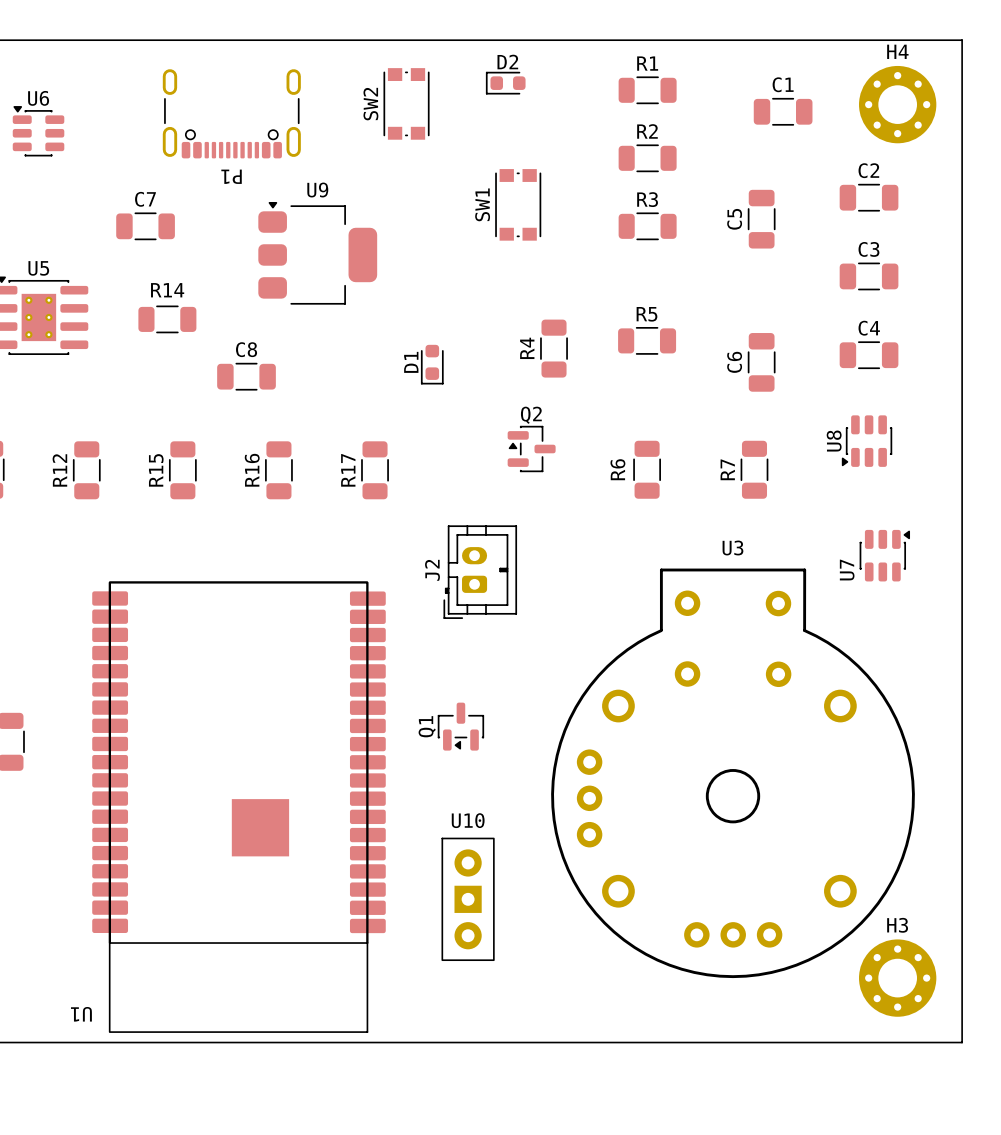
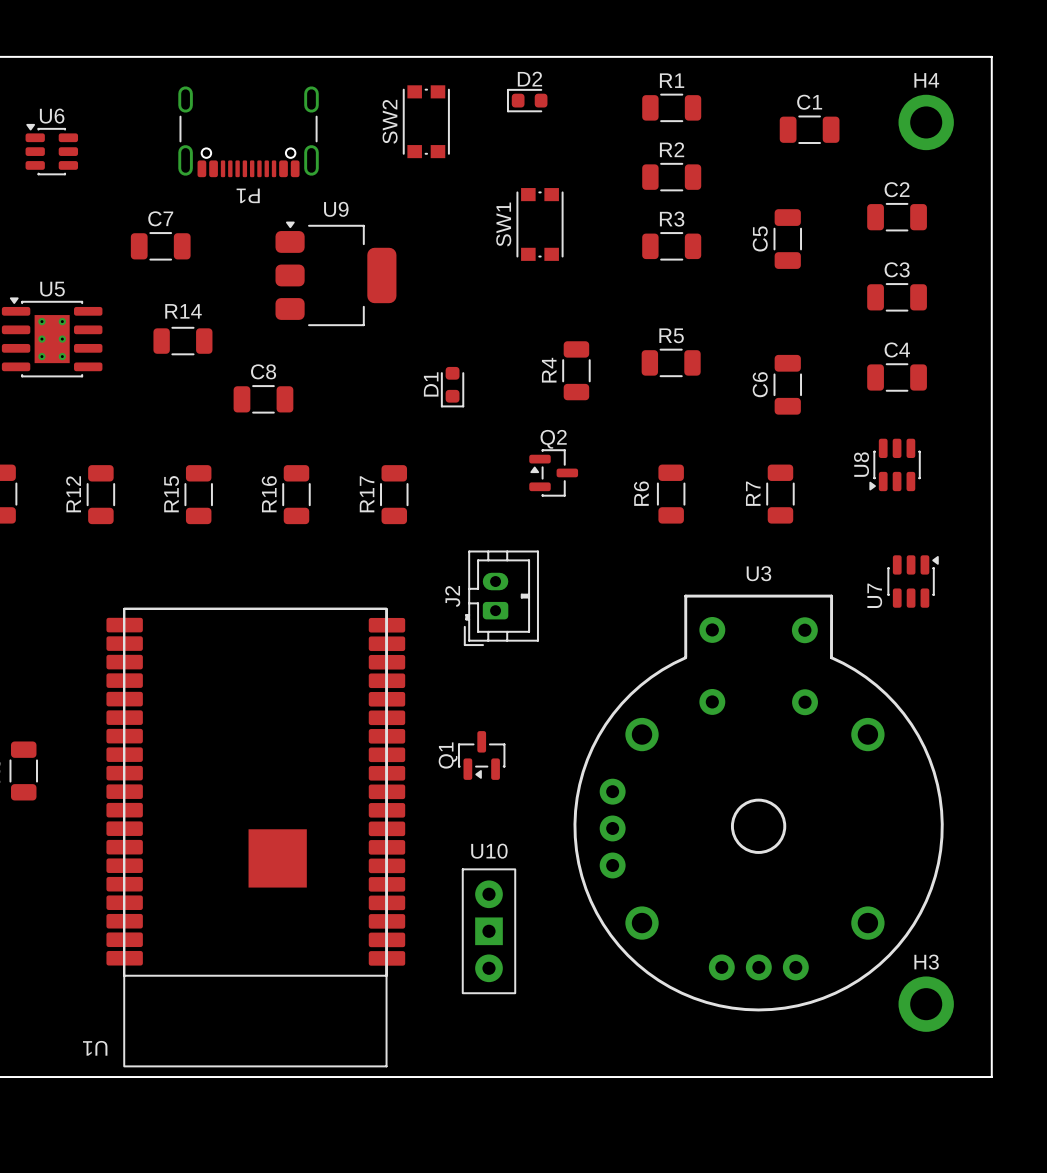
H4 footprint: [859, 65, 937, 144] -> [898, 94, 954, 151]
H3 footprint: [859, 939, 937, 1017] -> [898, 976, 954, 1032]

